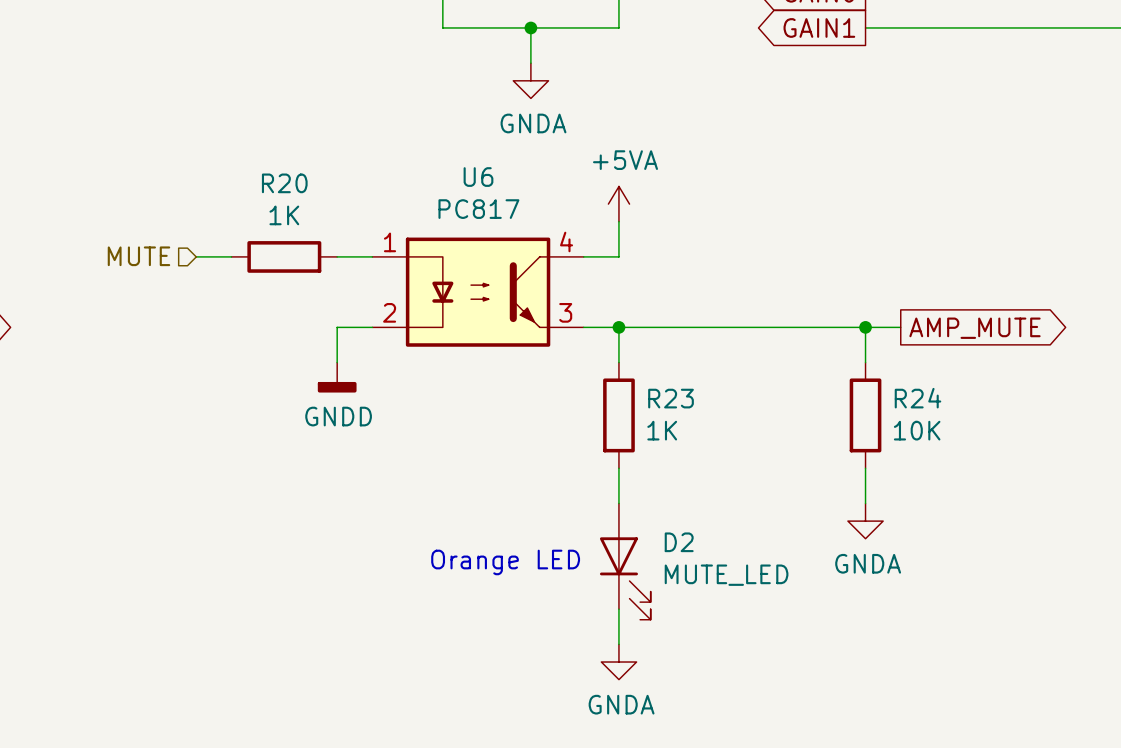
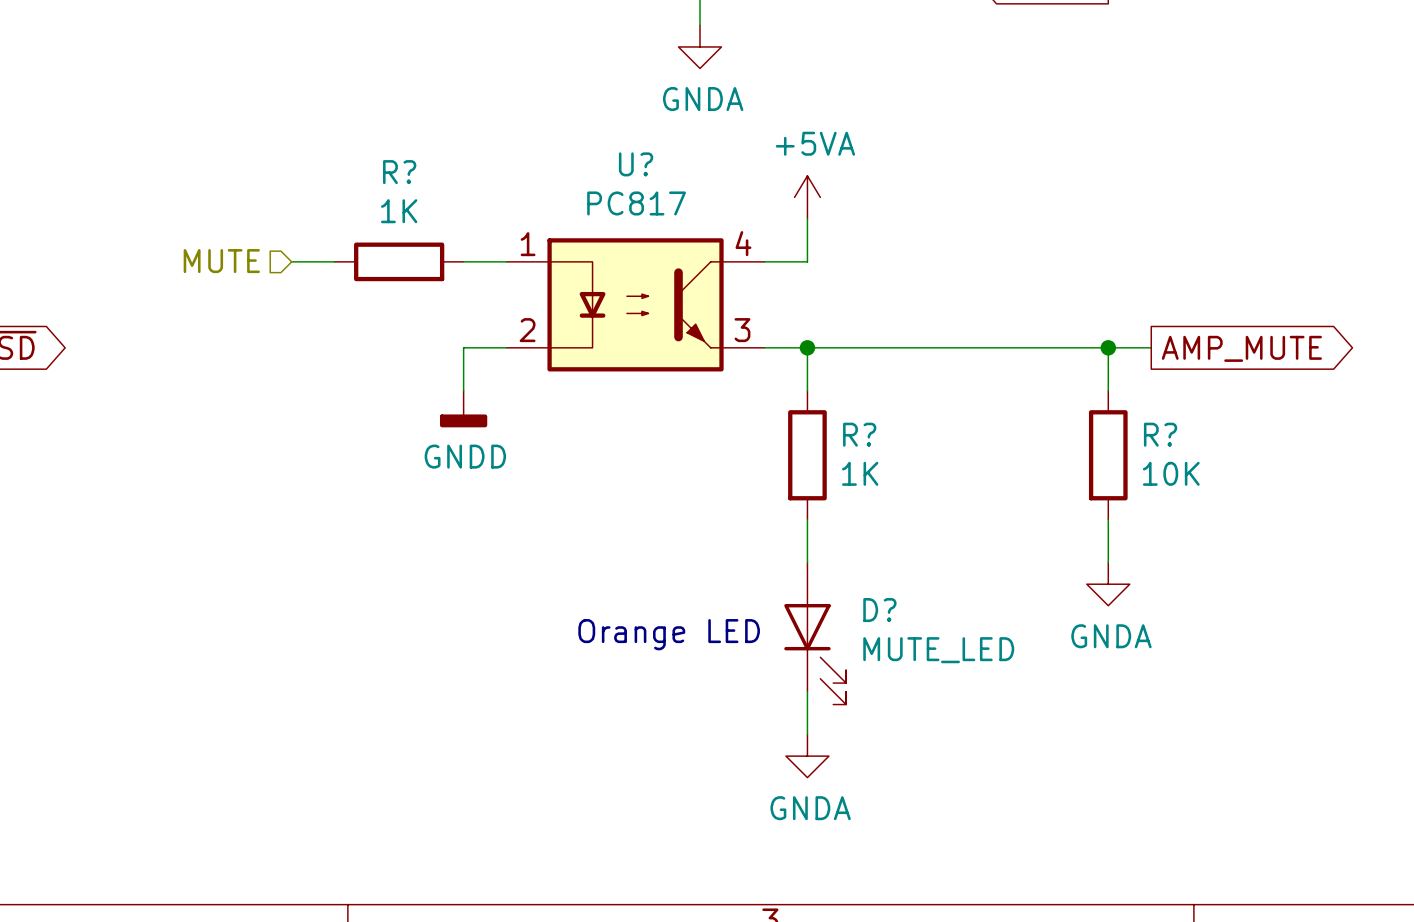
U6 name: U6 (478, 177) -> U? (636, 164)
R20 name: R20 (284, 183) -> R? (399, 172)
R23 name: R23 (671, 398) -> R? (859, 434)
R24 name: R24 (917, 398) -> R? (1160, 434)
D2 name: D2 (679, 542) -> D? (879, 610)

